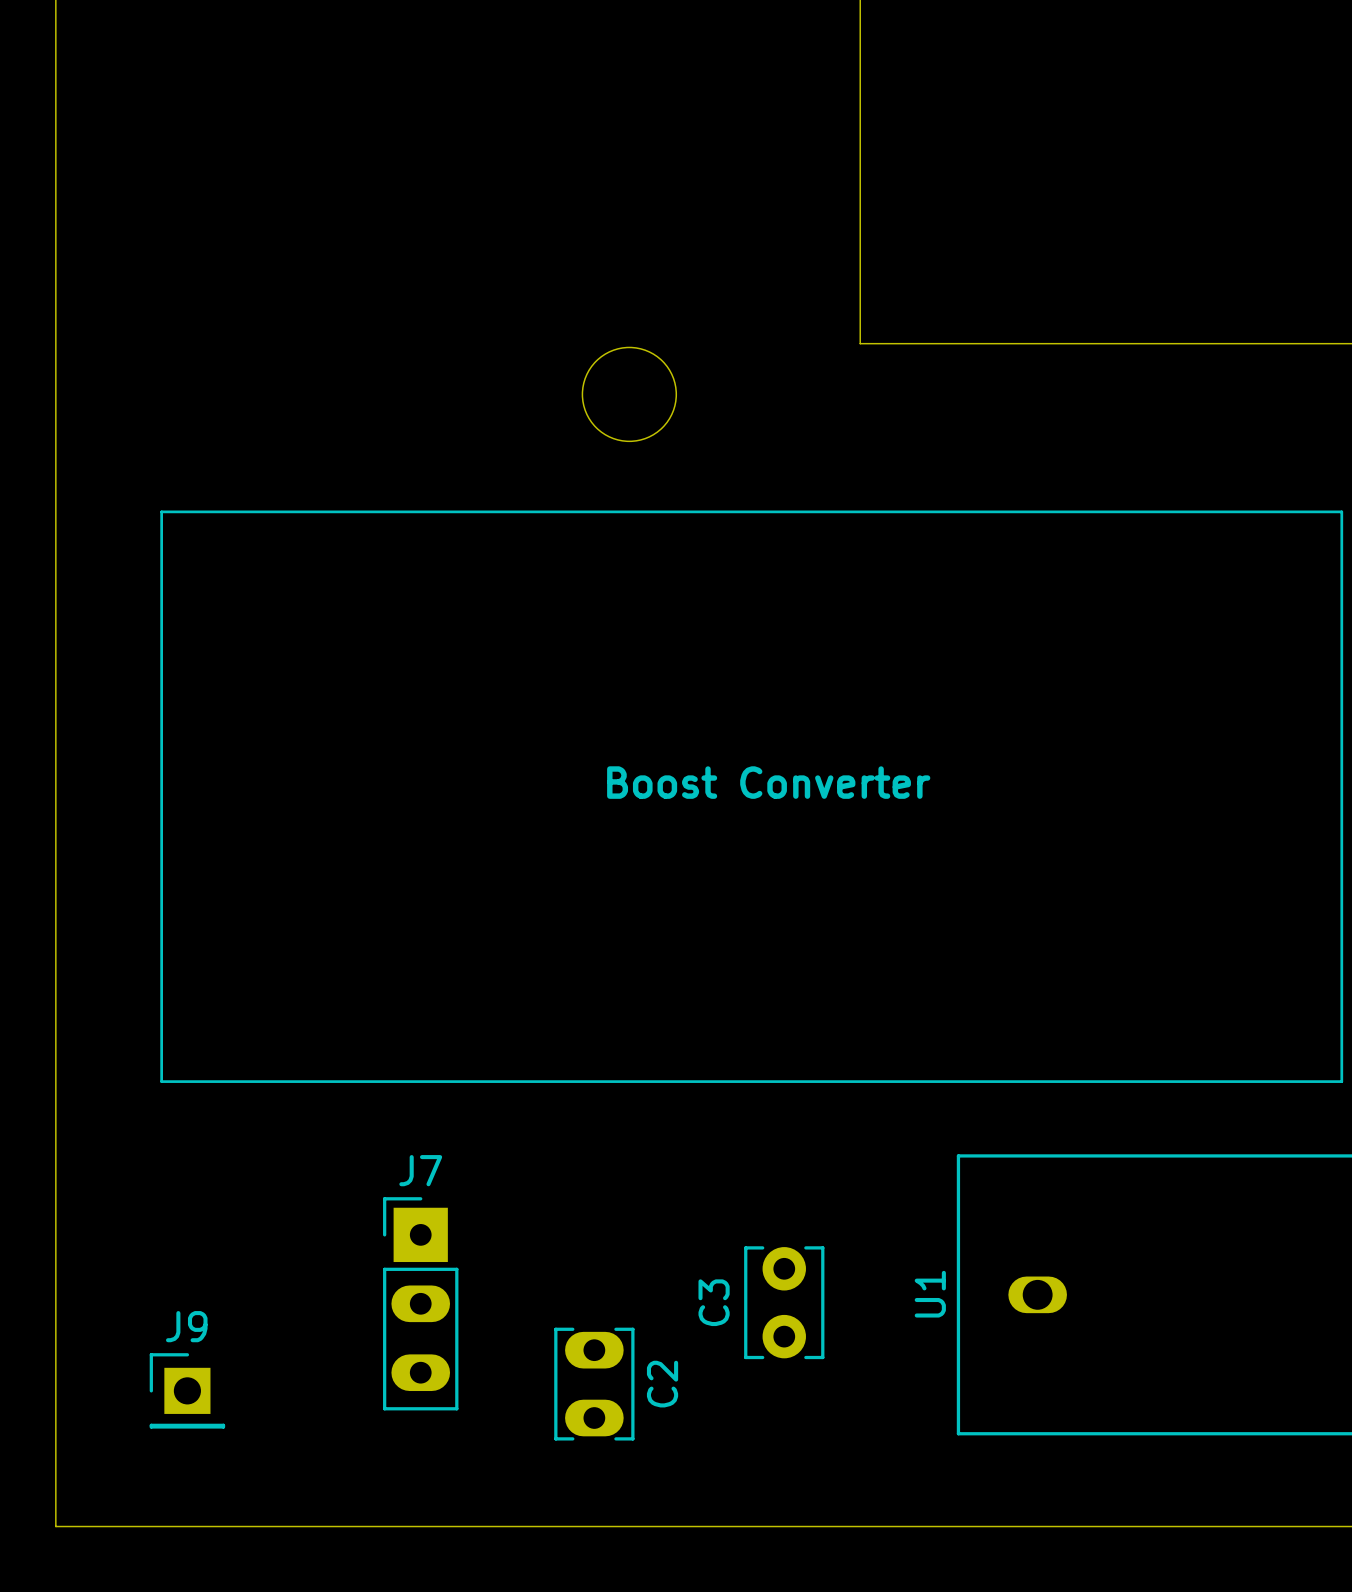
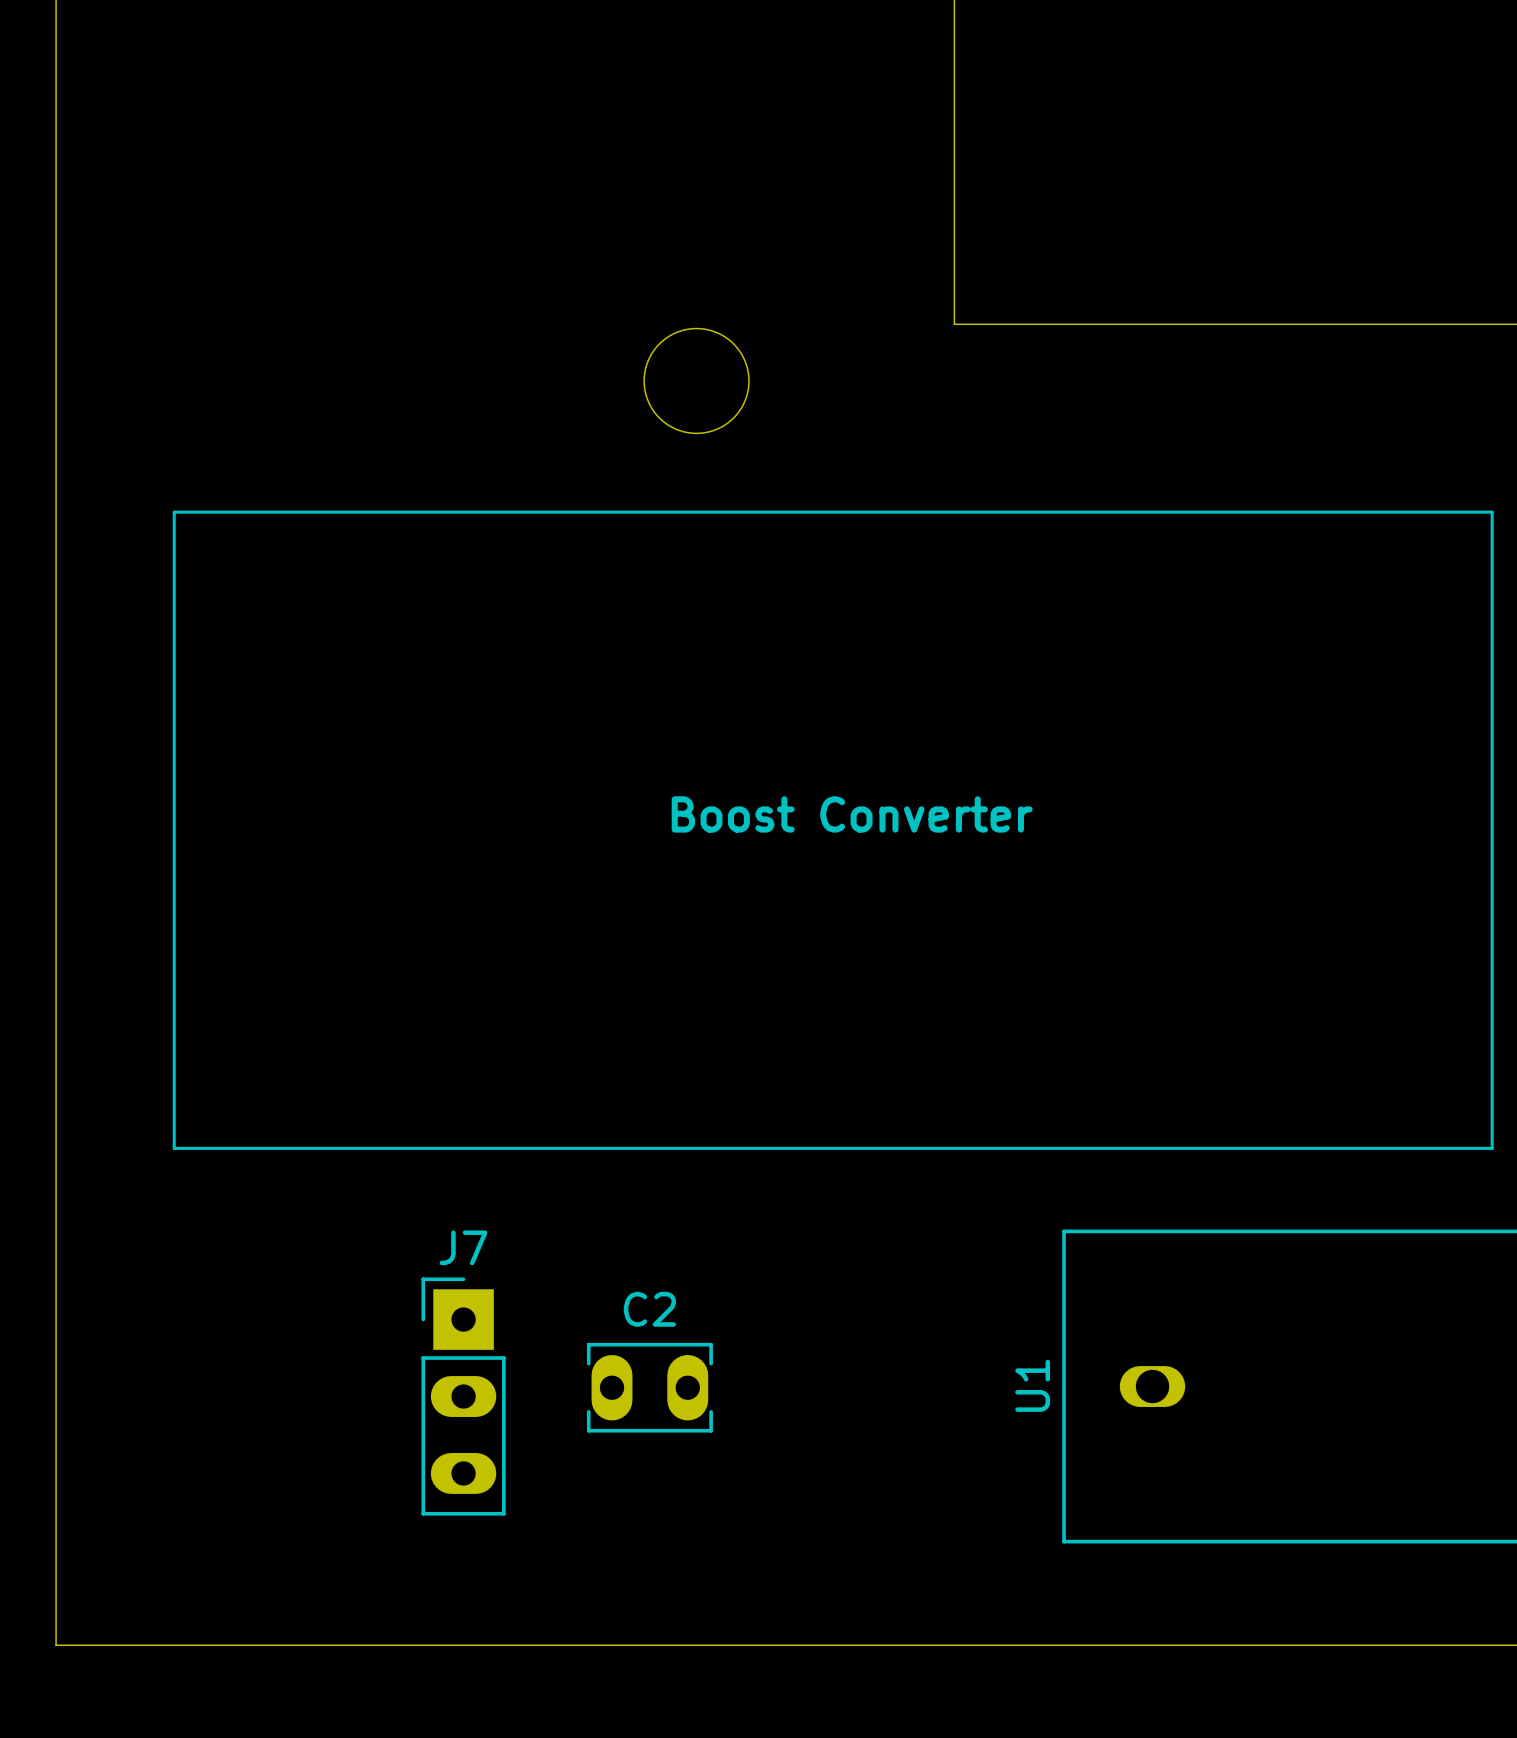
C3: (784, 1302) -> none
C2 rotation: 0° (594, 1384) -> 90° clockwise (649, 1387)
C2 position: (594, 1384) -> (649, 1387)
C2 name position: C2 (662, 1384) -> C2 (649, 1309)
J9: (187, 1390) -> none

